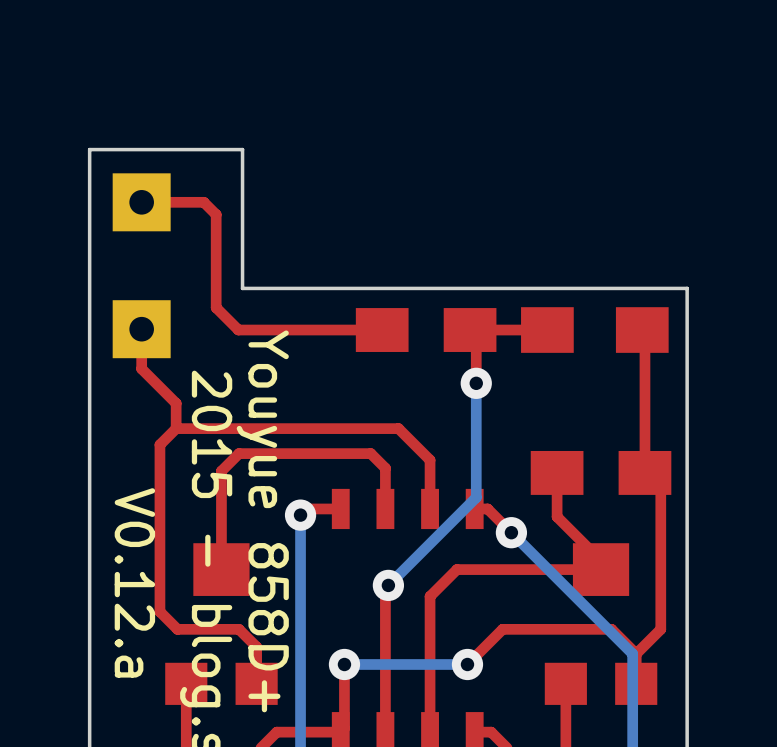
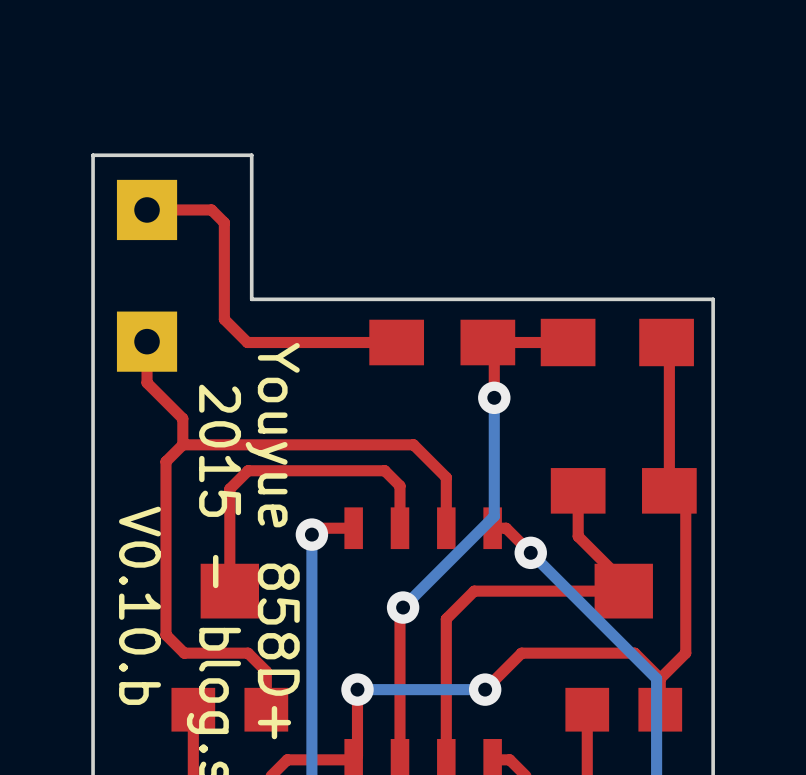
text: V0.12.a (134, 582) -> V0.10.b (140, 605)

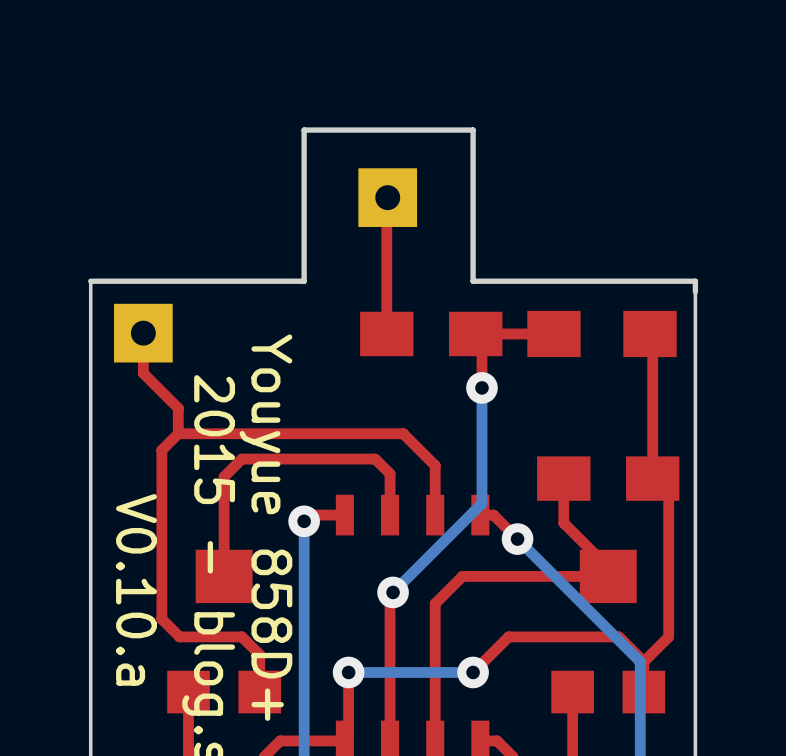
top track: (147, 209) (211, 209) (224, 222) (224, 319) (247, 342) (396, 342) -> (387, 197) (386, 333)
part position: (147, 209) -> (387, 197)
board edge: (93, 288) (93, 155) (251, 155) (251, 299) (713, 299) -> (90, 281) (304, 281) (304, 130) (473, 130) (473, 281) (695, 281) (695, 291)
text: V0.10.b (140, 605) -> V0.10.a (136, 589)

